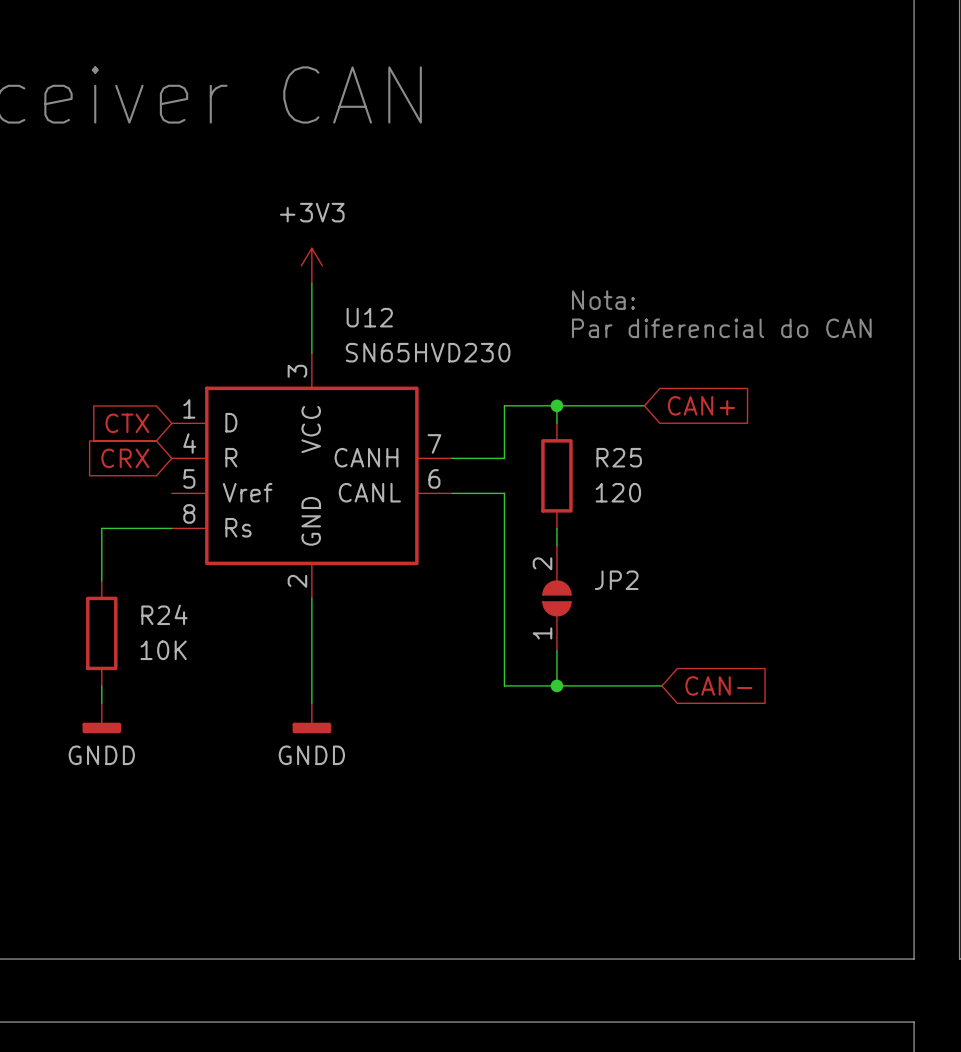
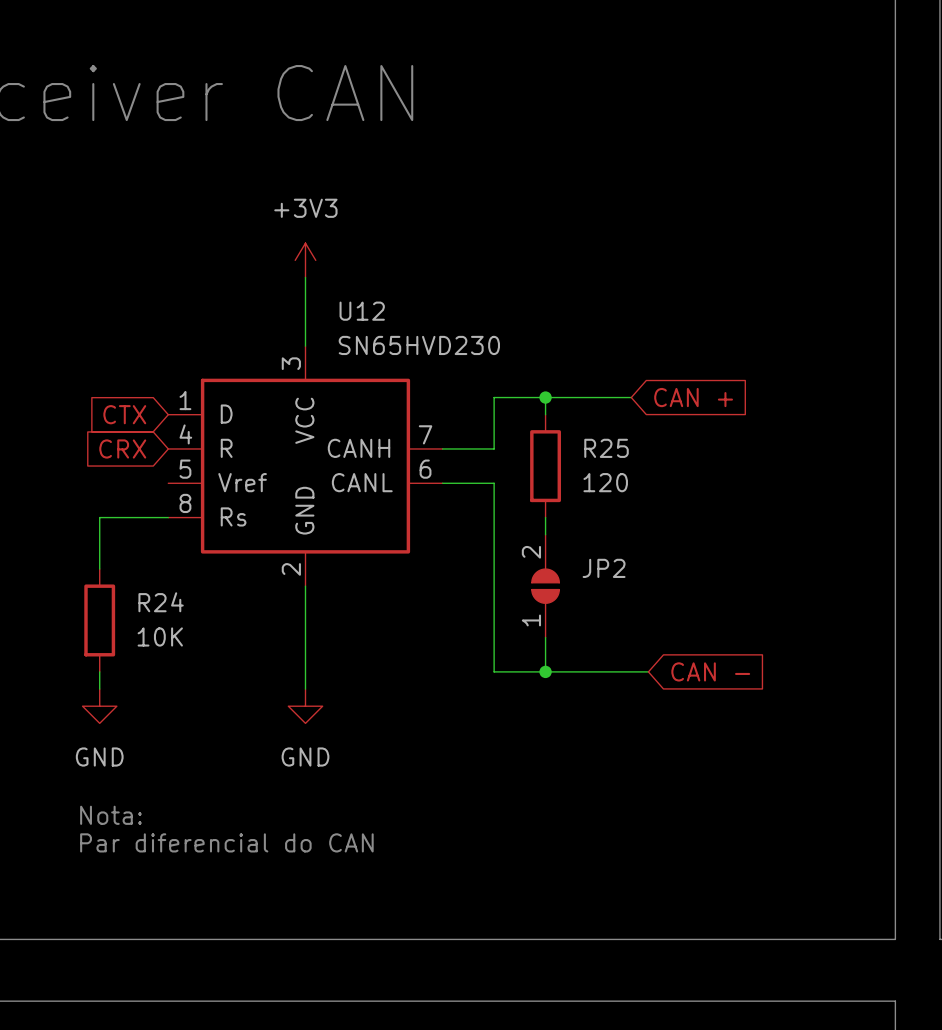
text: Nota: (603, 300) -> none
text: Par diferencial do CAN (721, 328) -> none
global label: CAN+ (701, 405) -> CAN + (693, 397)
global label: CAN- (718, 685) -> CAN - (710, 671)
power symbol: GNDD (101, 718) -> GND (99, 706)
power symbol: GNDD (311, 718) -> GND (305, 706)
text: none -> Nota: (110, 815)
text: none -> Par diferencial do CAN (226, 842)

